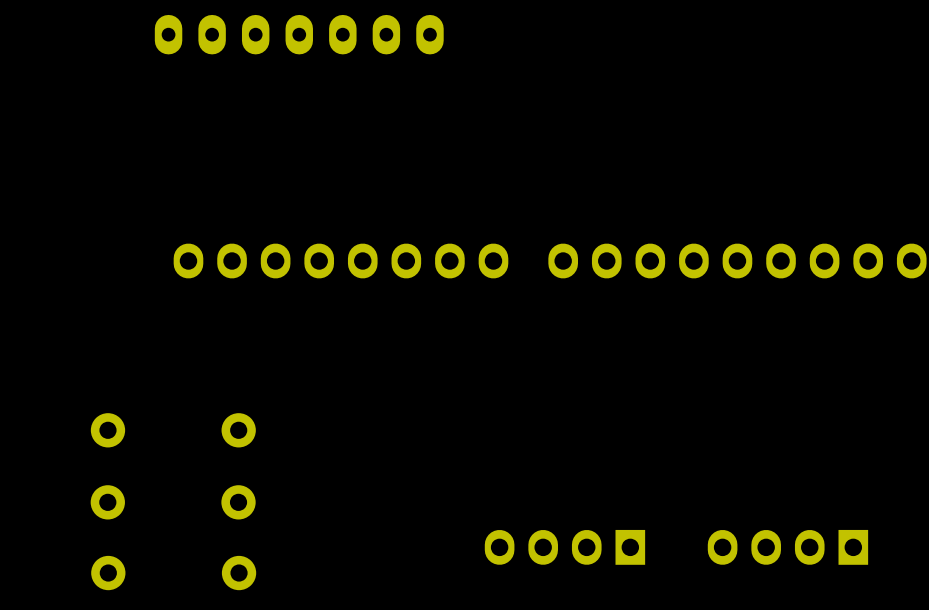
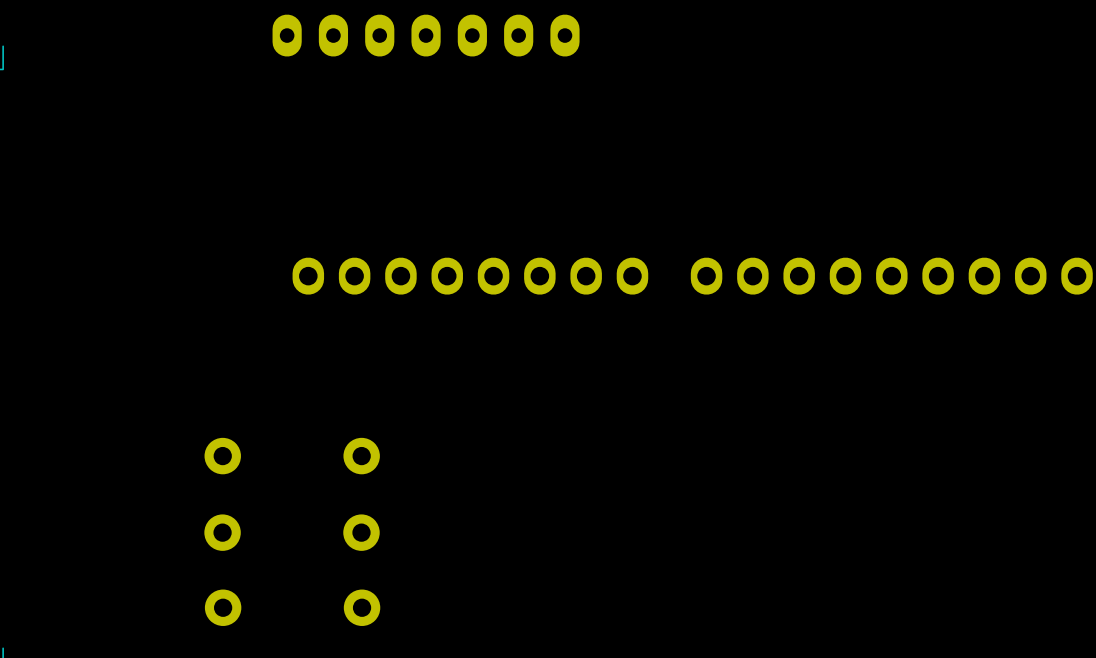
part: (564, 547) -> none
part: (787, 547) -> none

